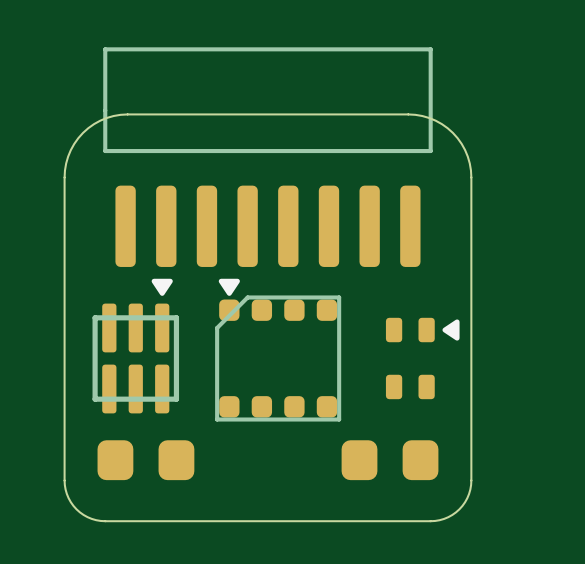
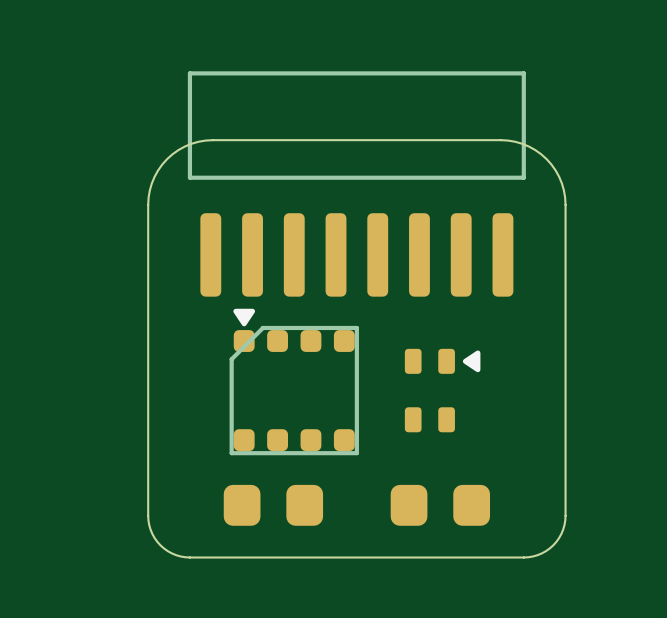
part: (135, 346) -> none
part position: (278, 350) -> (294, 382)
part position: (422, 358) -> (442, 390)
part position: (145, 460) -> (273, 505)
part position: (390, 460) -> (440, 505)

